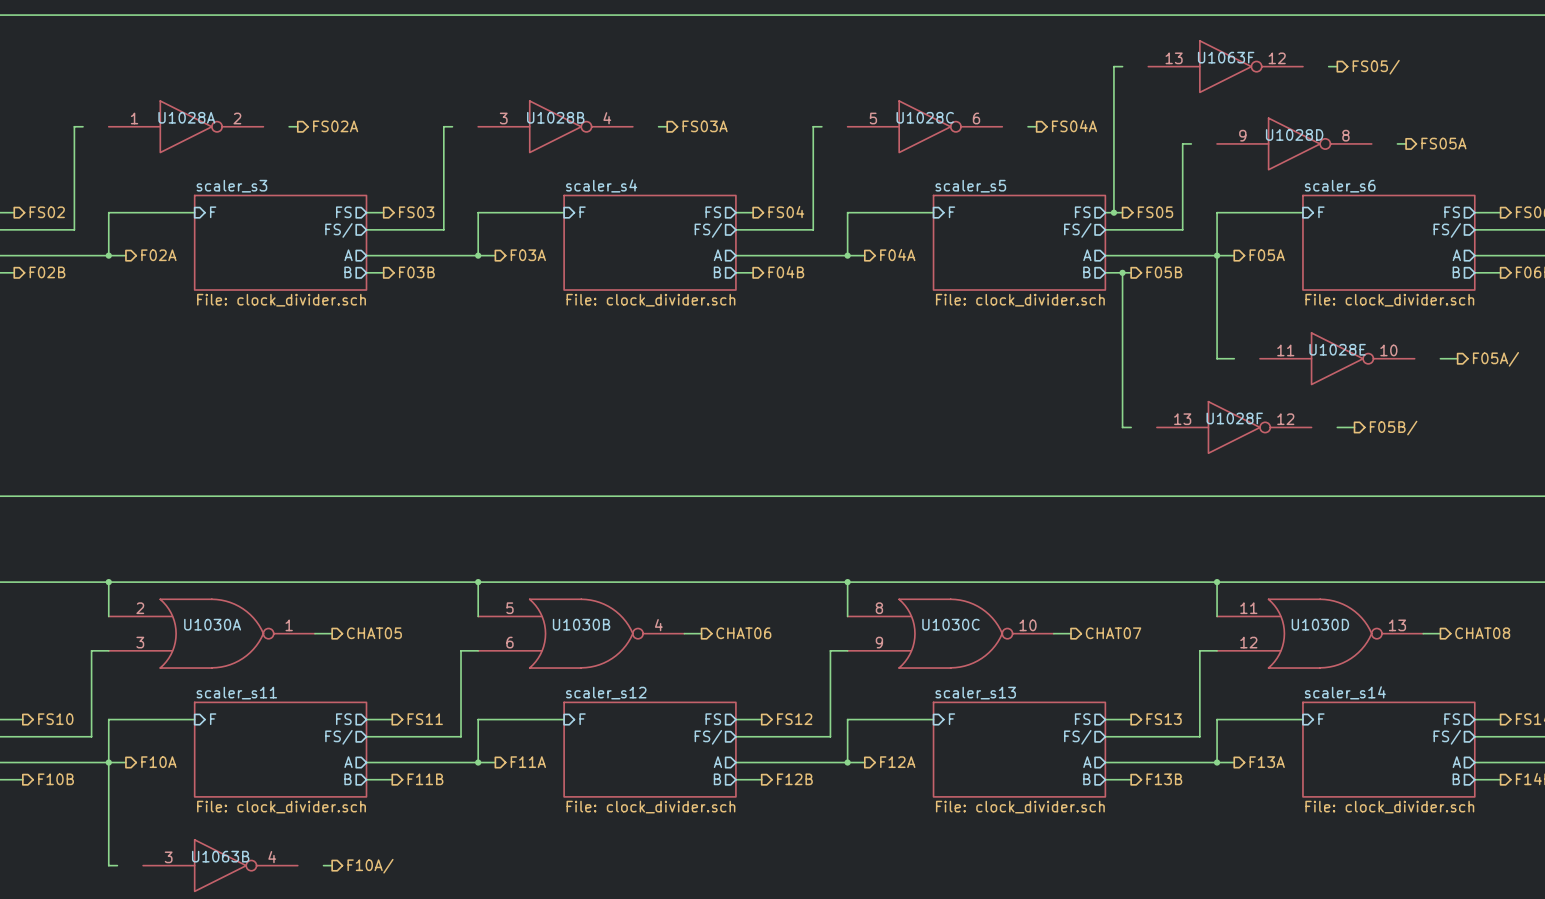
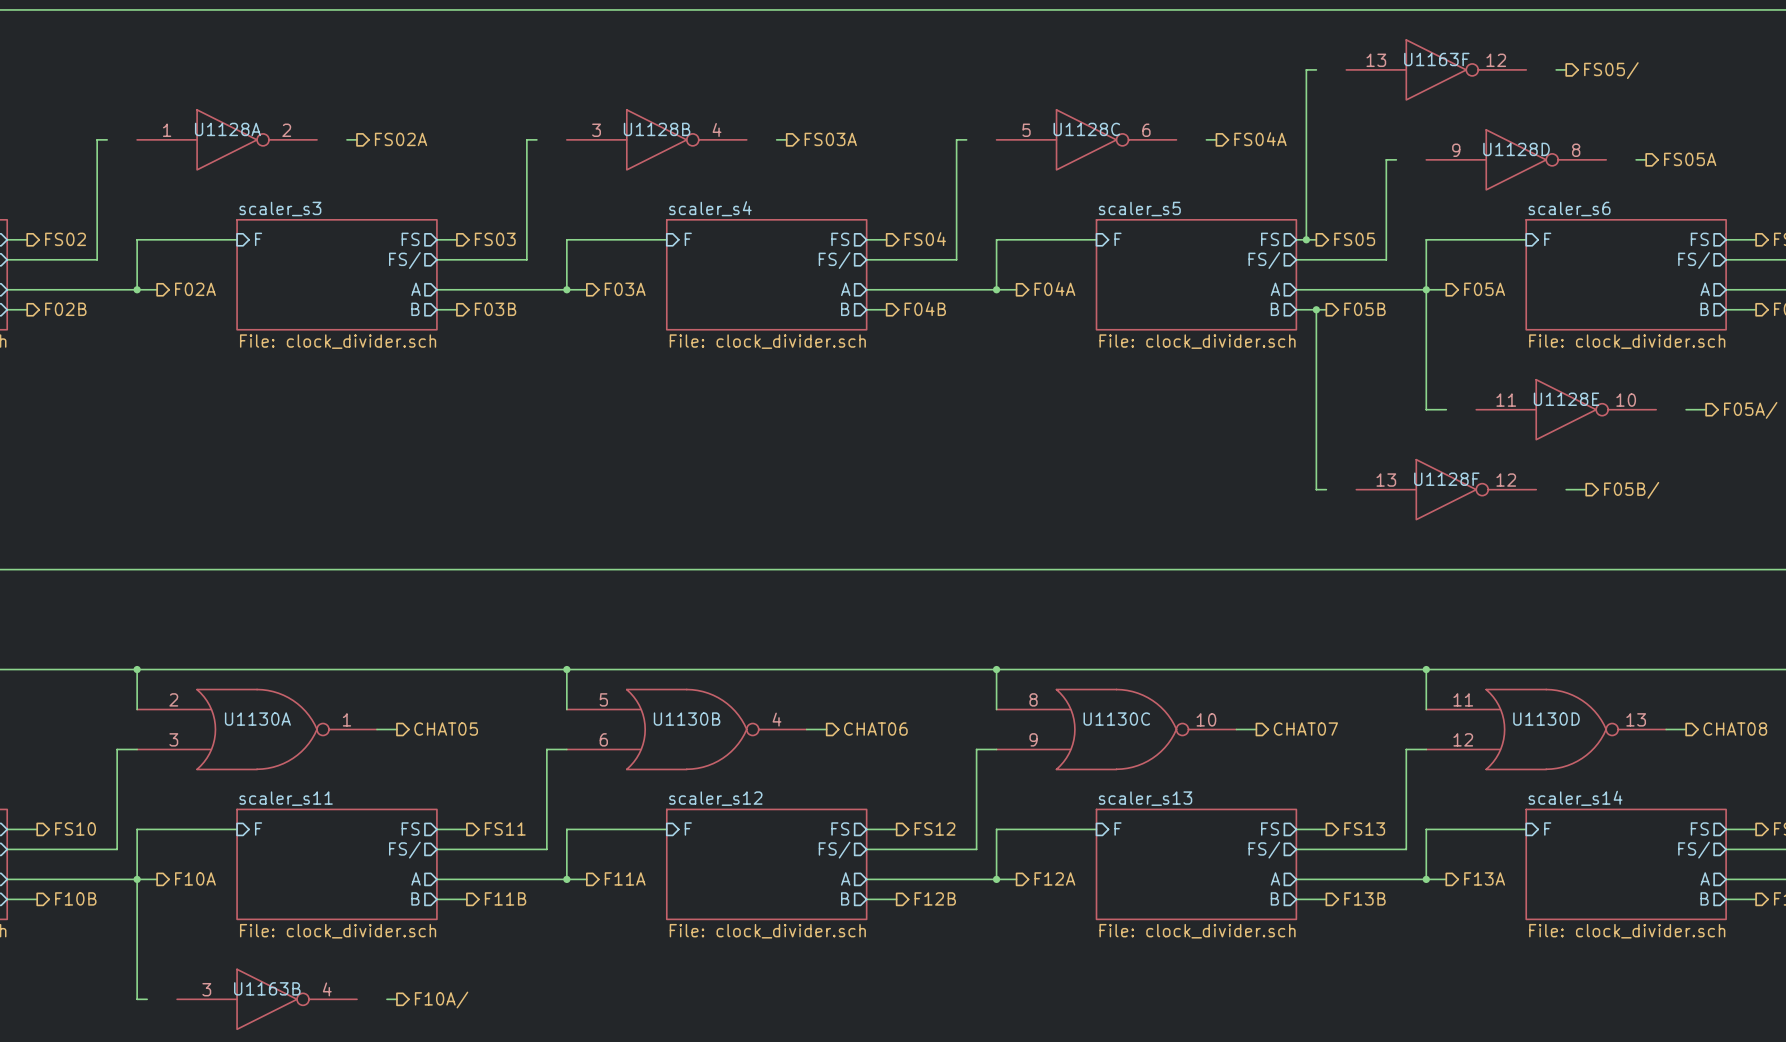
U1063F name: U1063F (1226, 57) -> U1163F (1436, 59)
U1028A name: U1028A (186, 117) -> U1128A (227, 129)
U1028B name: U1028B (555, 117) -> U1128B (657, 129)
U1028C name: U1028C (925, 117) -> U1128C (1086, 129)
U1028D name: U1028D (1294, 134) -> U1128D (1516, 149)
U1028E name: U1028E (1337, 349) -> U1128E (1566, 399)
U1028F name: U1028F (1234, 418) -> U1128F (1446, 479)
U1030A name: U1030A (212, 624) -> U1130A (257, 719)
U1030B name: U1030B (581, 624) -> U1130B (687, 719)
U1030C name: U1030C (950, 624) -> U1130C (1116, 719)
U1030D name: U1030D (1320, 624) -> U1130D (1546, 719)
U1063B name: U1063B (220, 856) -> U1163B (267, 988)

